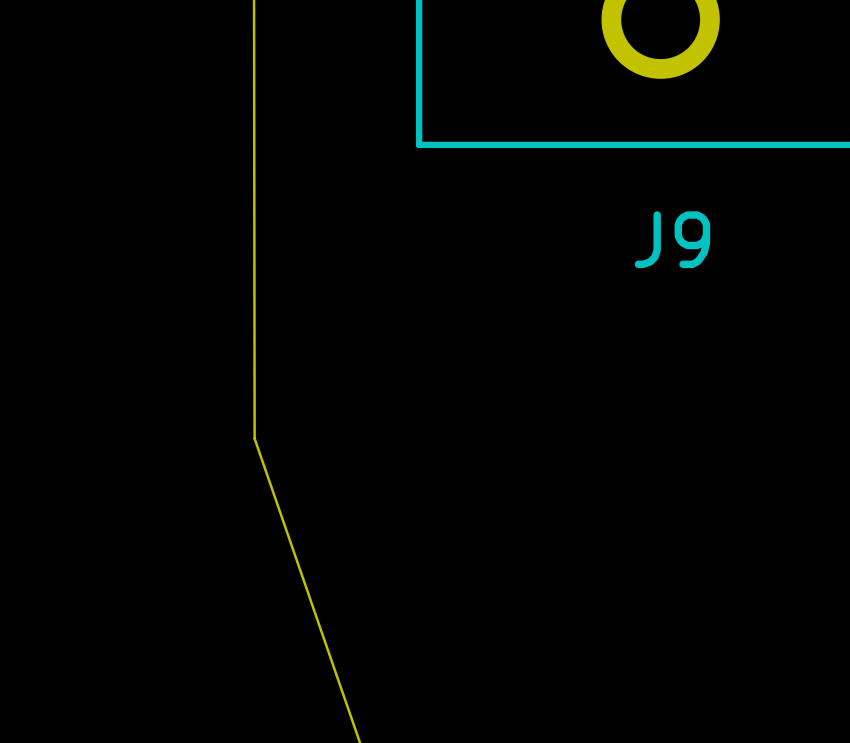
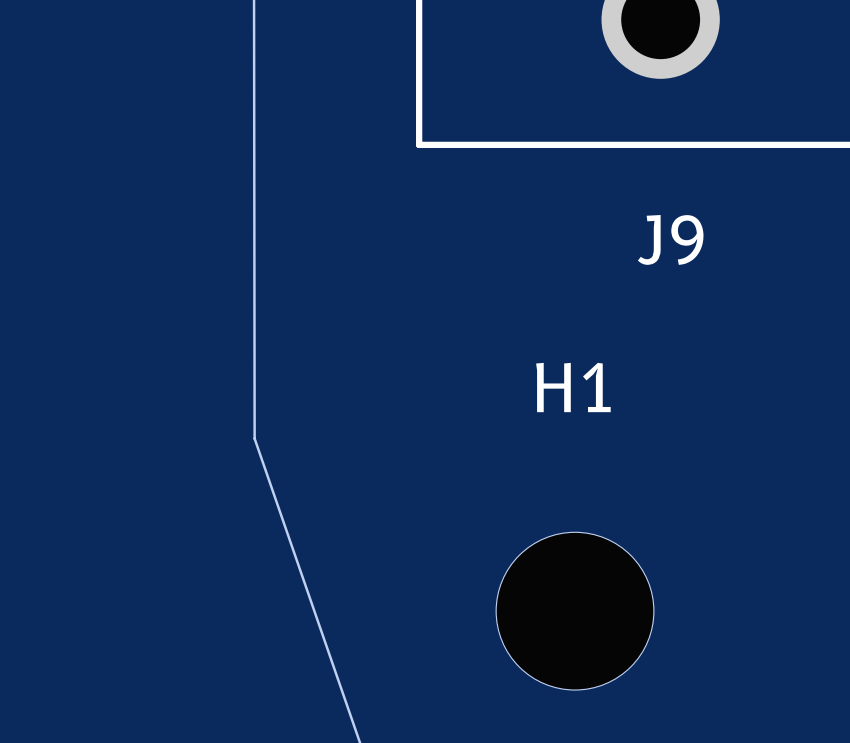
H1: none -> (575, 611)

